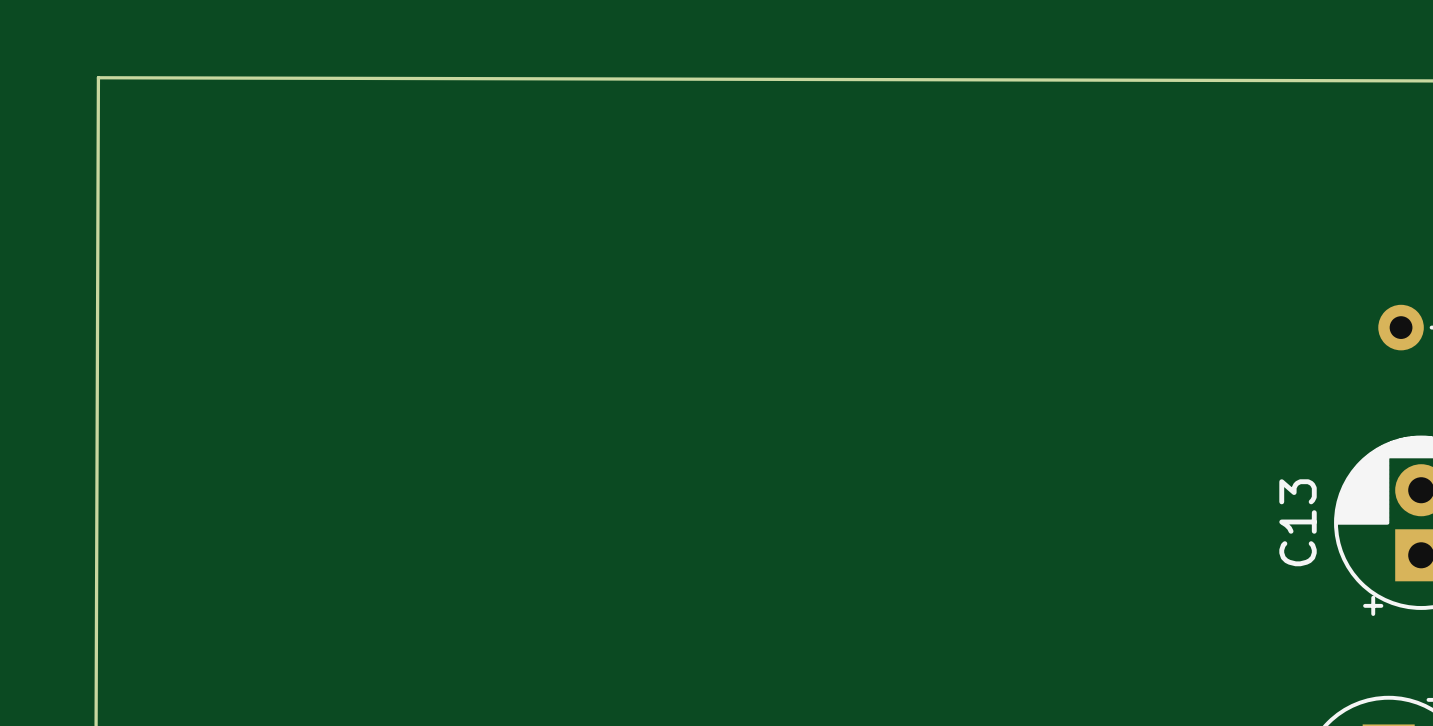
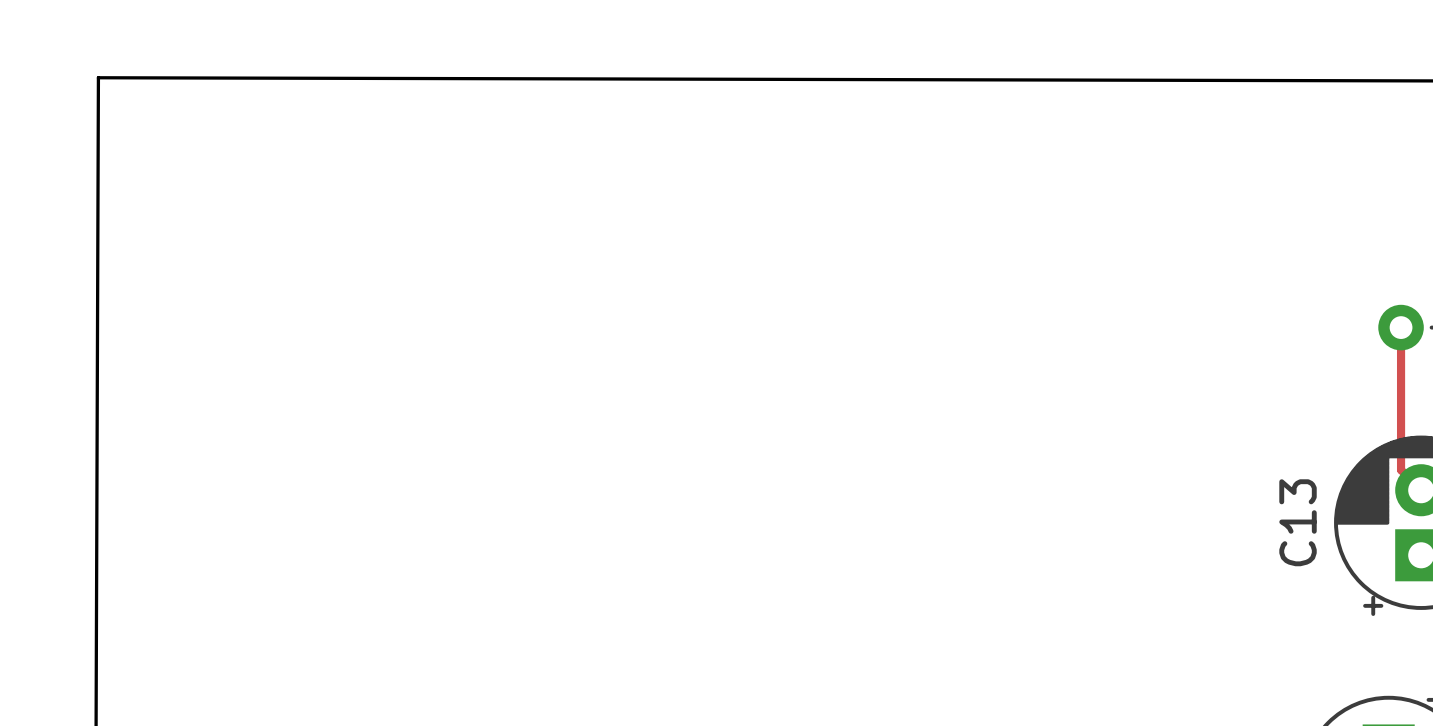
track: none -> (1401, 327) (1401, 470) (1421, 490)

